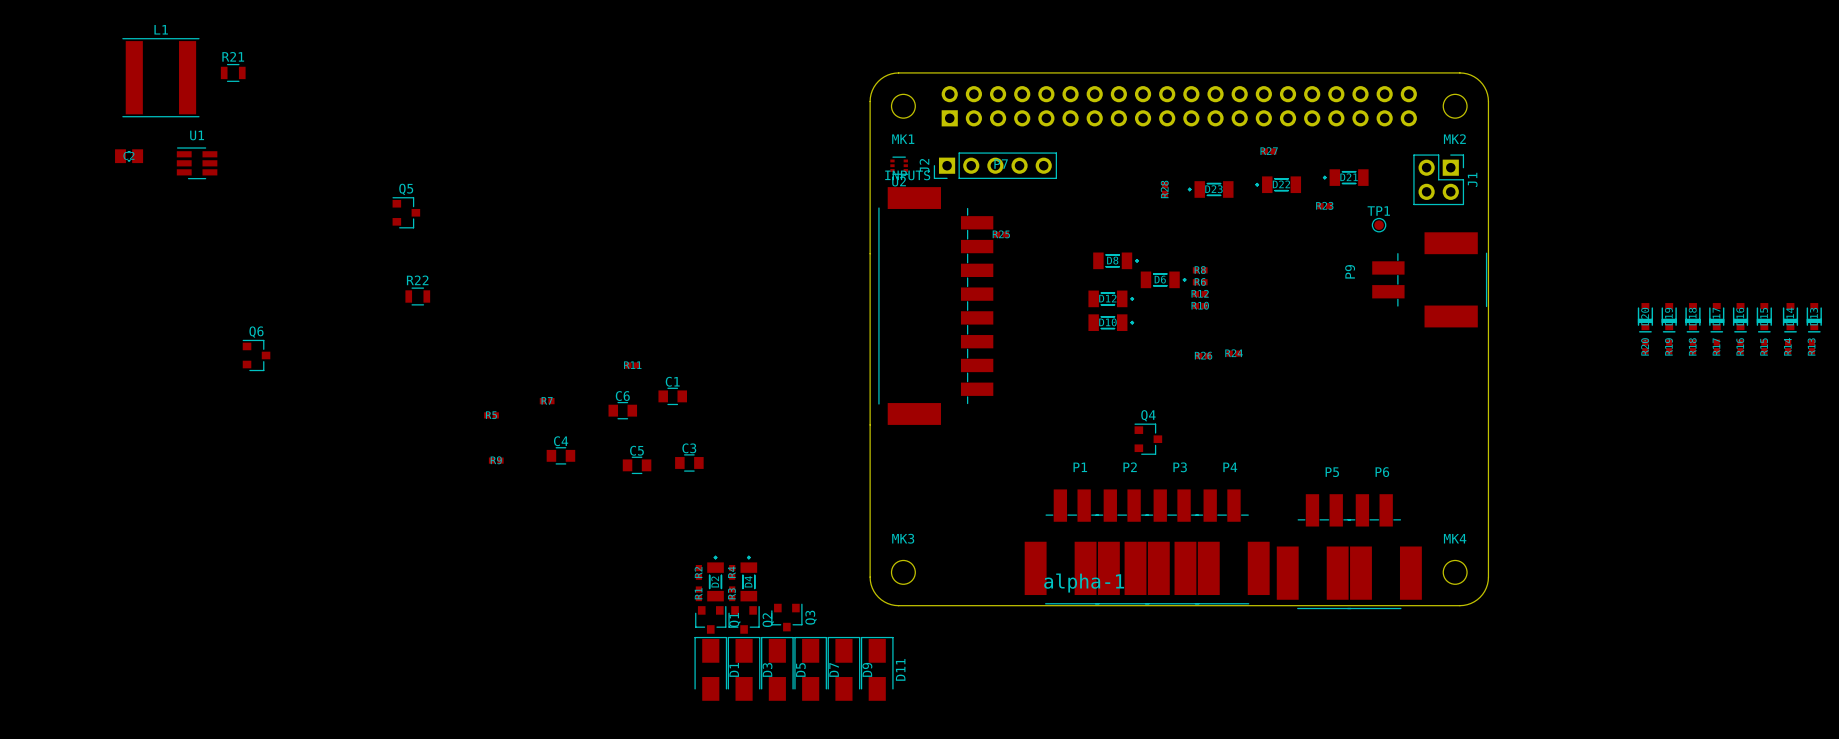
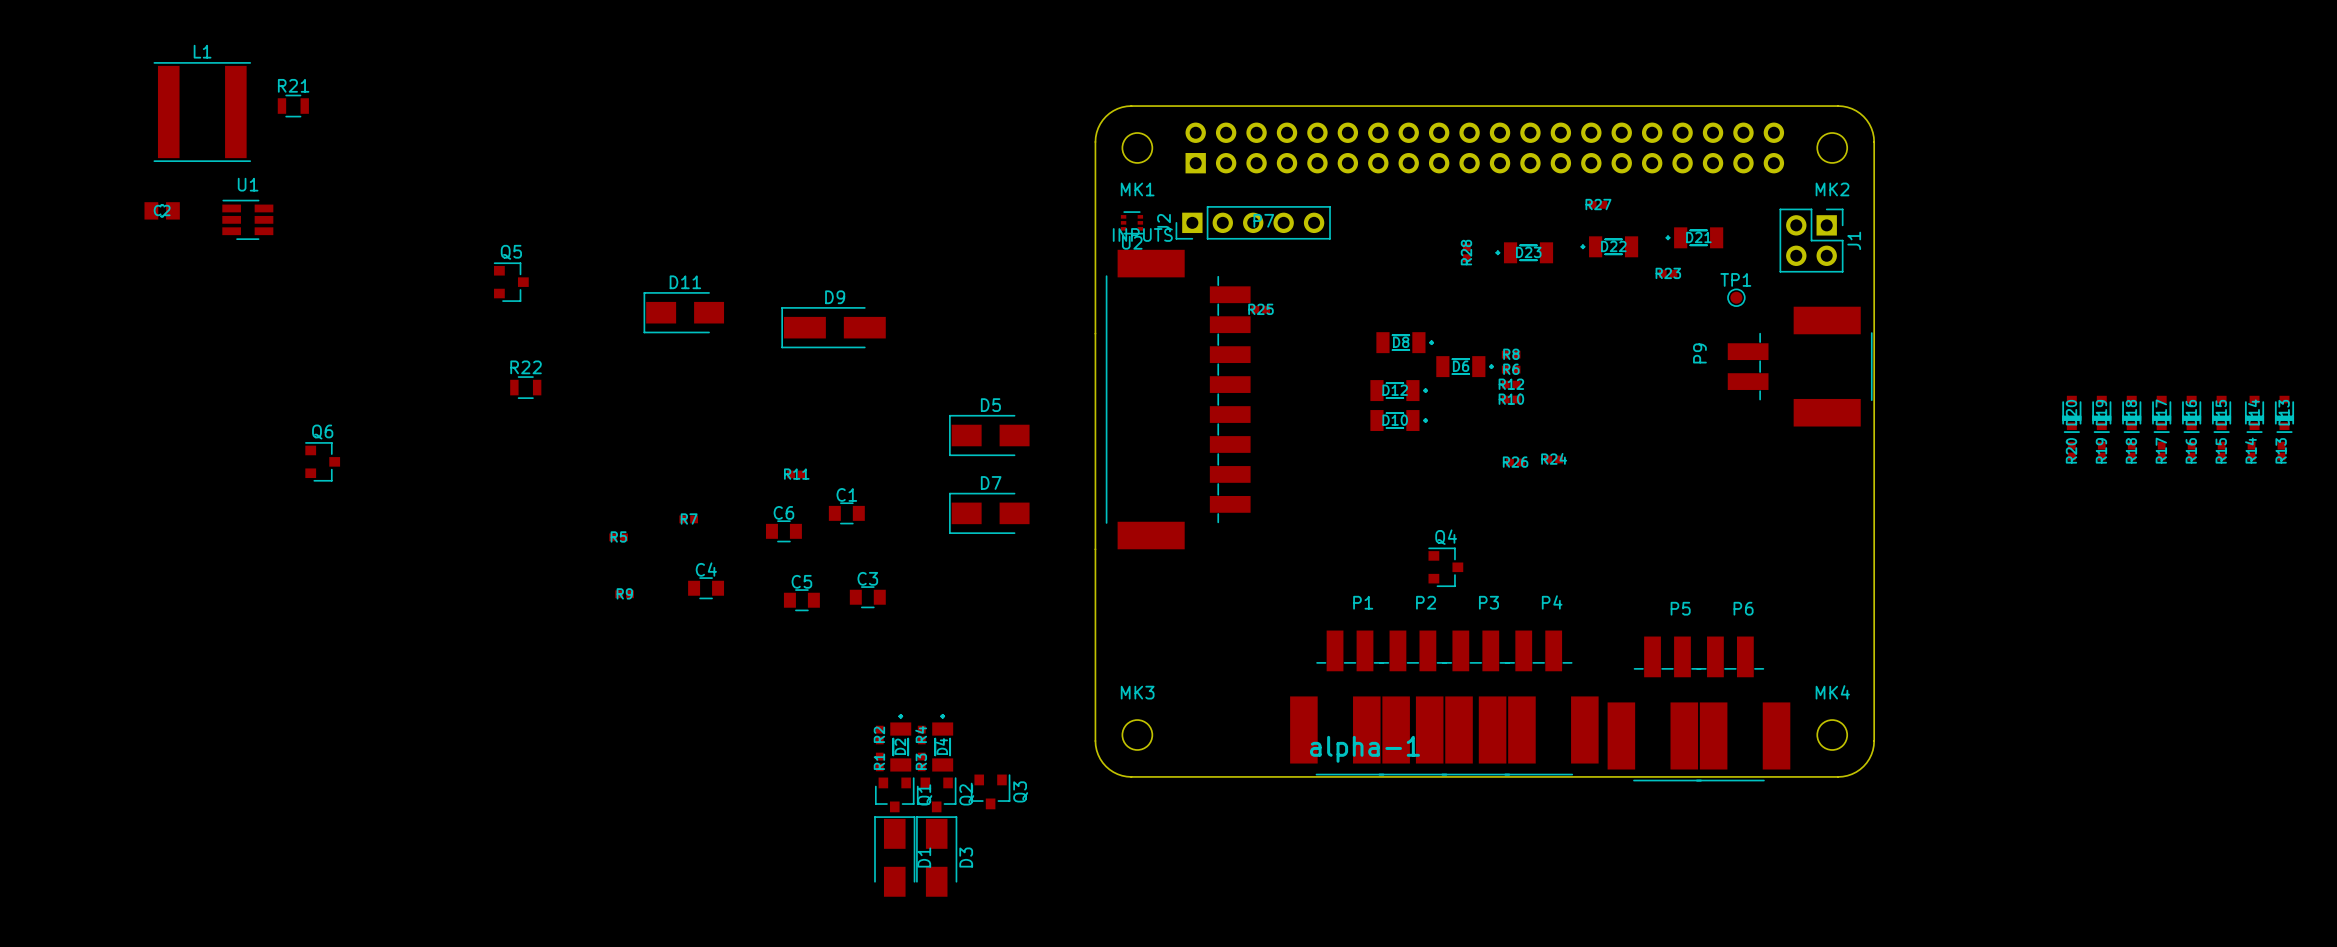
D9 footprint: [827, 636, 861, 701] -> [781, 307, 886, 349]
D5 rotation: 0° (777, 668) -> 90° counterclockwise (989, 435)
D5 position: (777, 668) -> (989, 435)
D7 rotation: 0° (810, 668) -> 90° counterclockwise (989, 513)
D7 position: (810, 668) -> (989, 513)
D11 rotation: 0° (877, 668) -> 90° counterclockwise (683, 312)
D11 position: (877, 668) -> (683, 312)
D9 name position: D9 (867, 669) -> D9 (835, 297)

